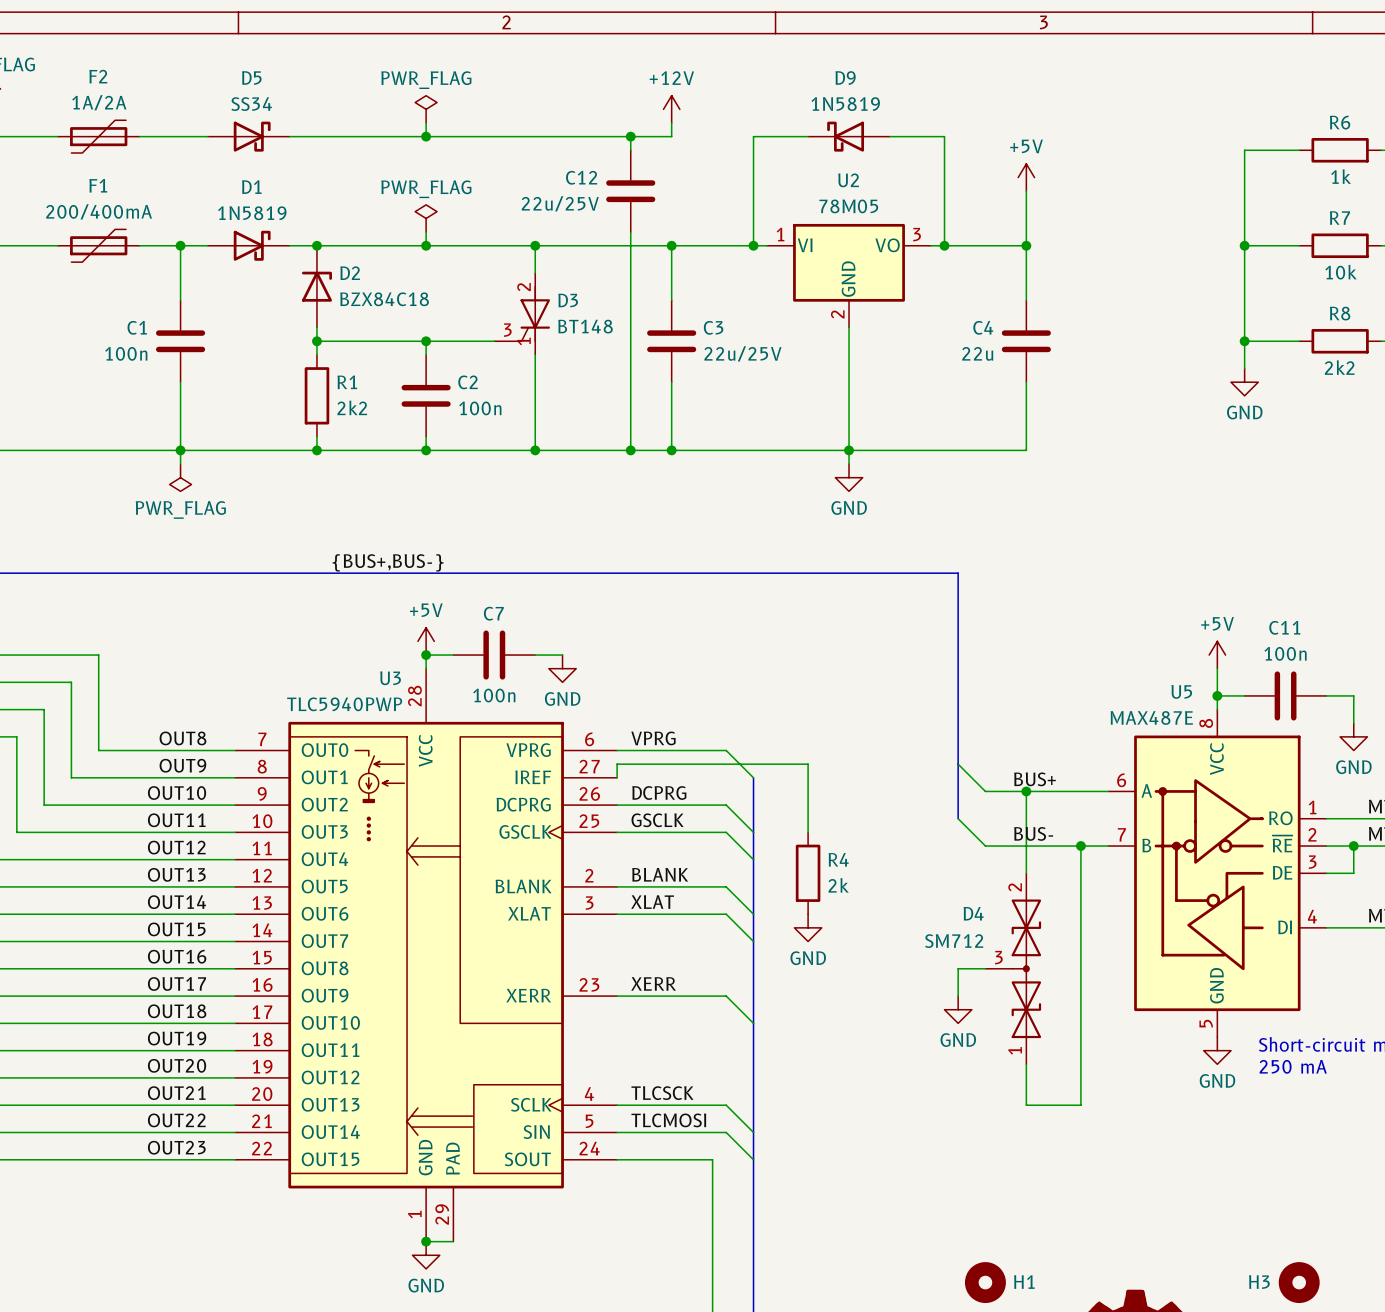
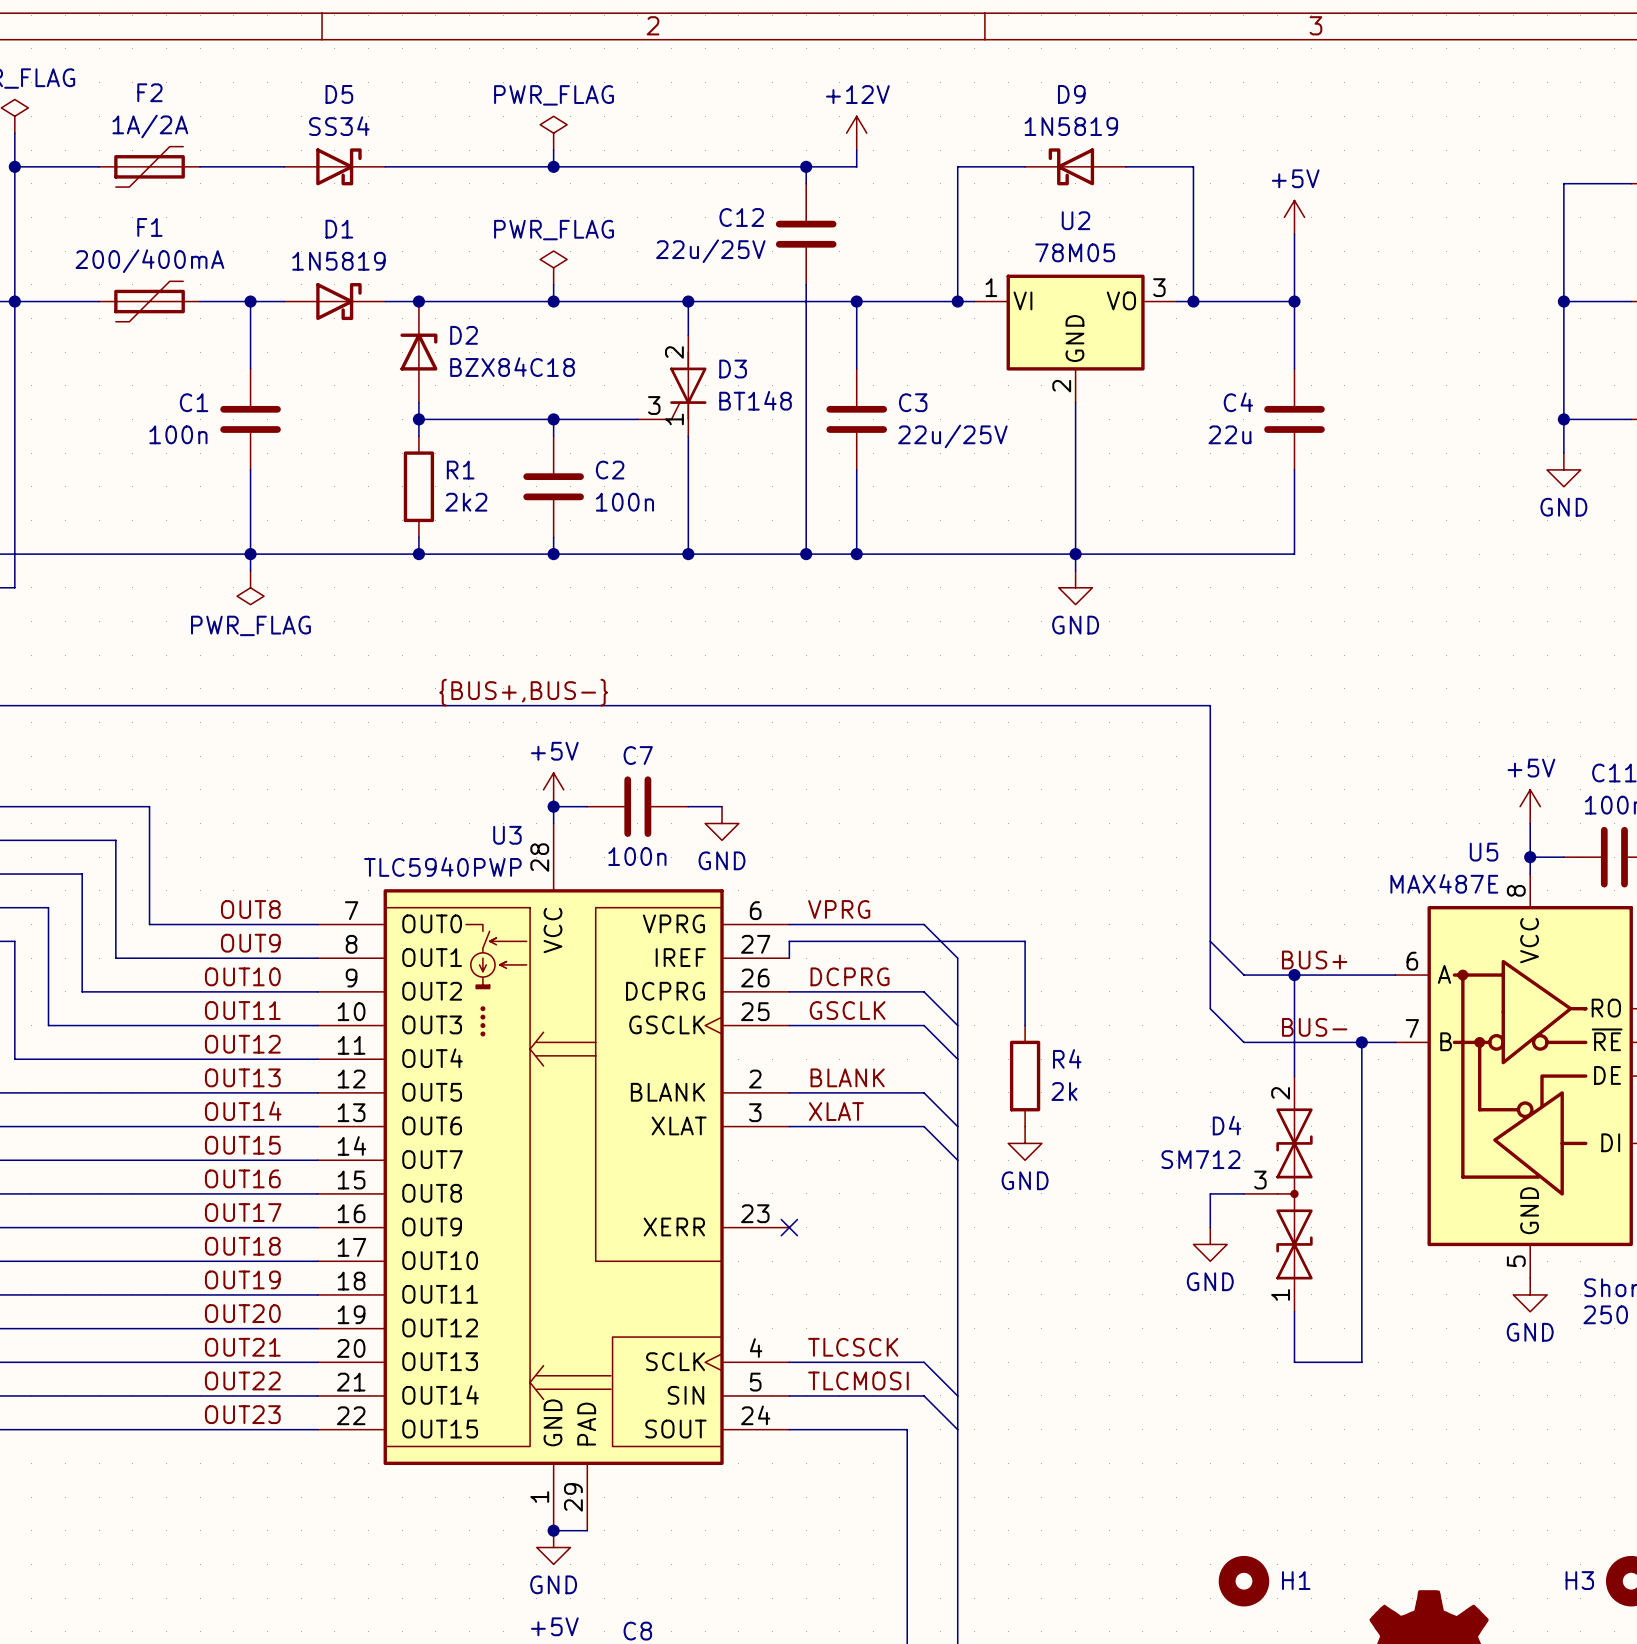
label: XERR (653, 983) -> none
wire: (617, 996) (726, 996) (753, 1023) -> none
no-connect mark: none -> (789, 1227)

